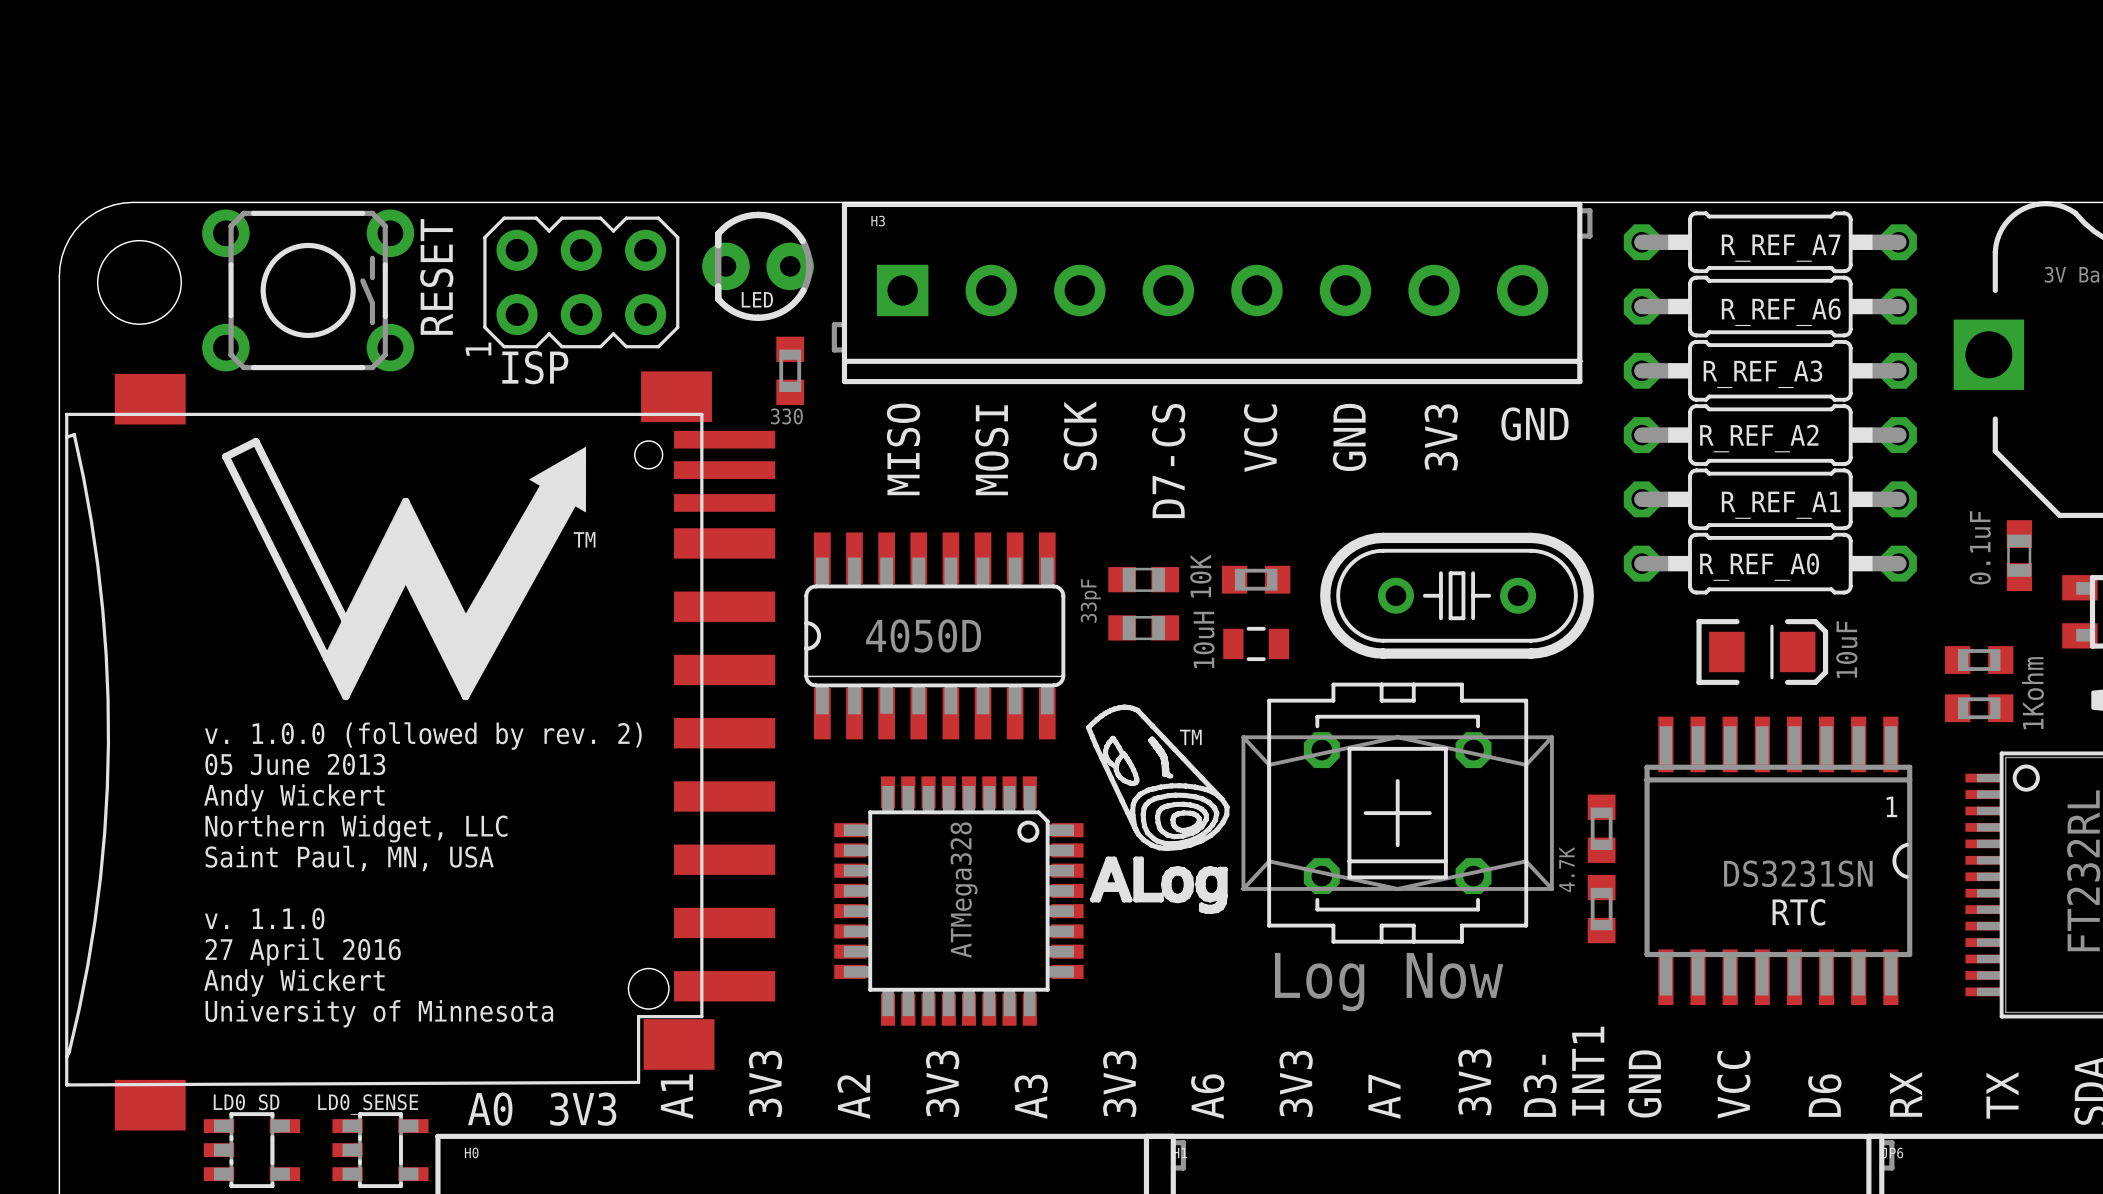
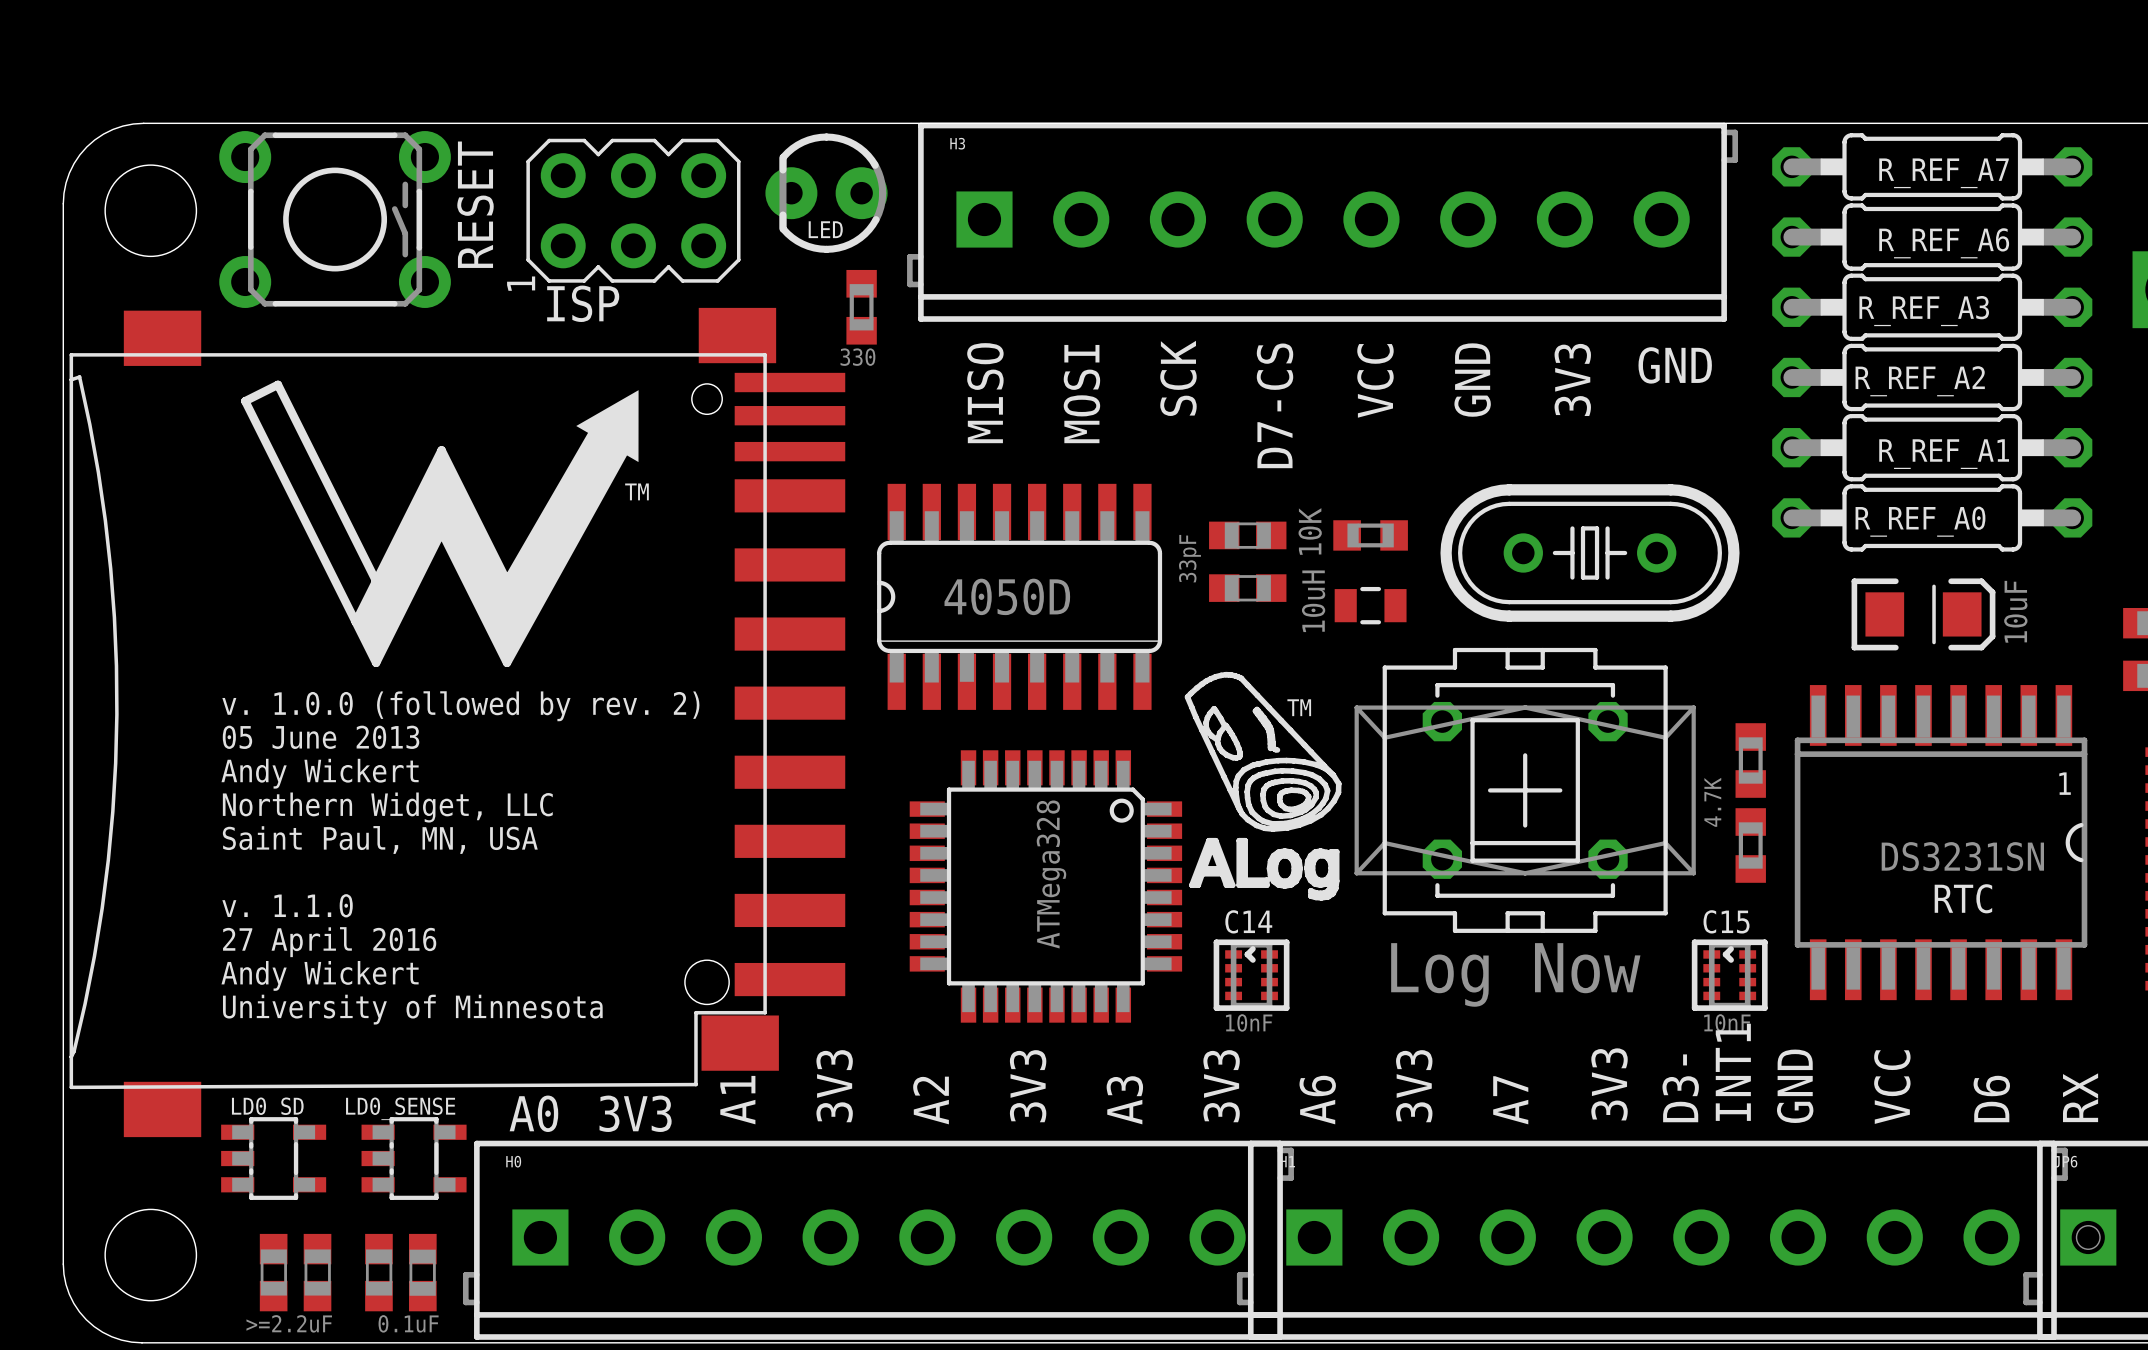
part position: (1601, 828) -> (1750, 760)
part position: (1601, 909) -> (1750, 845)
C14: none -> 10nF (1251, 975)
C15: none -> 10nF (1729, 975)

